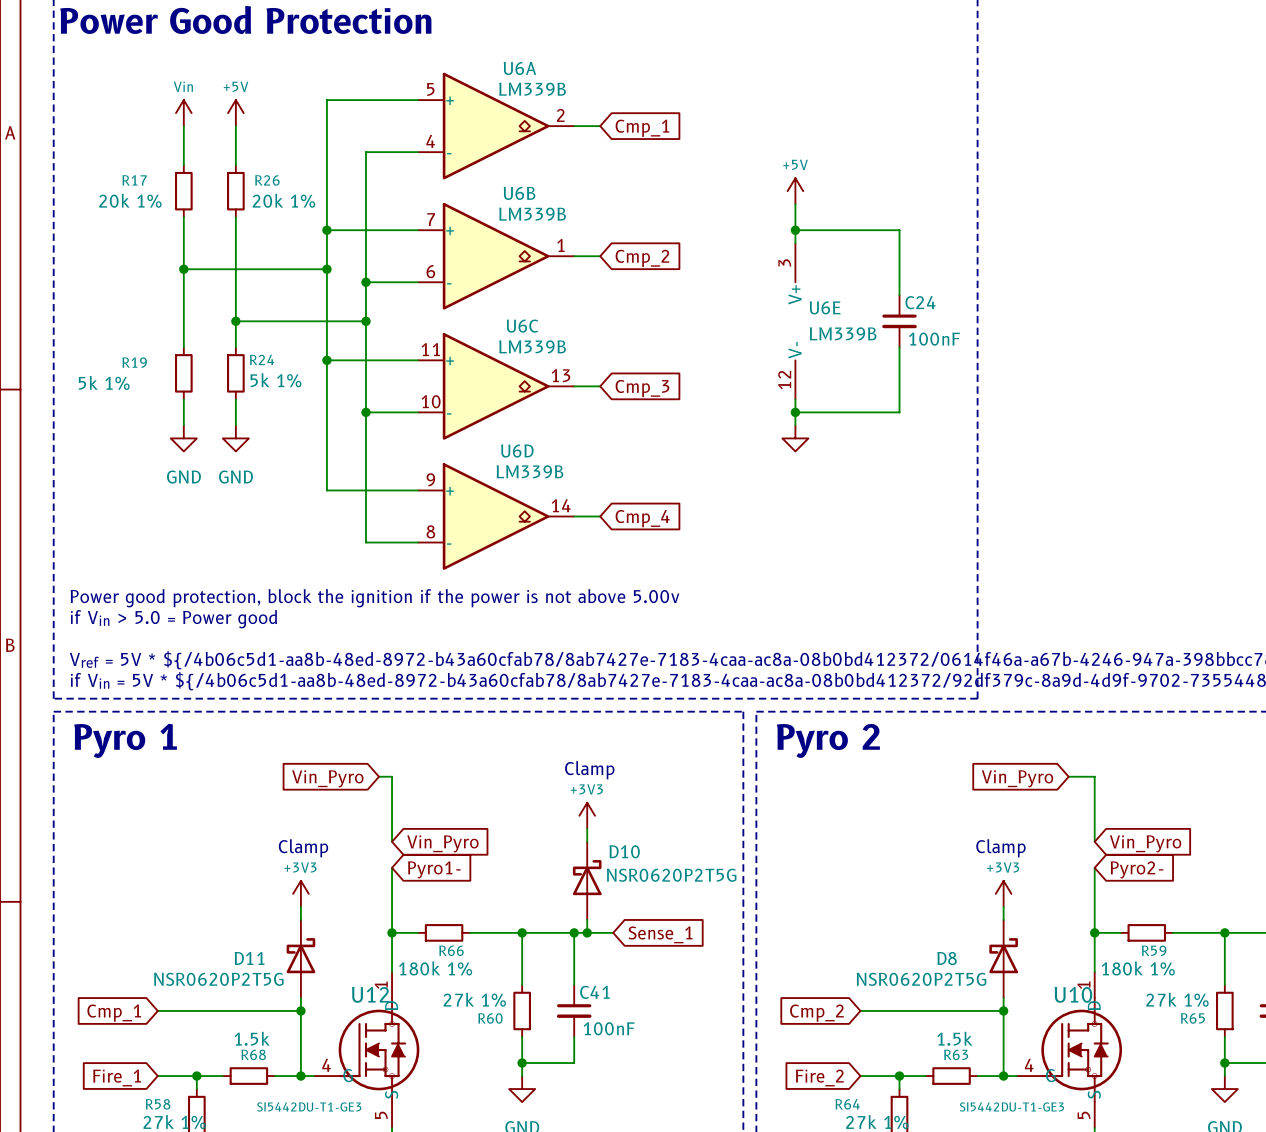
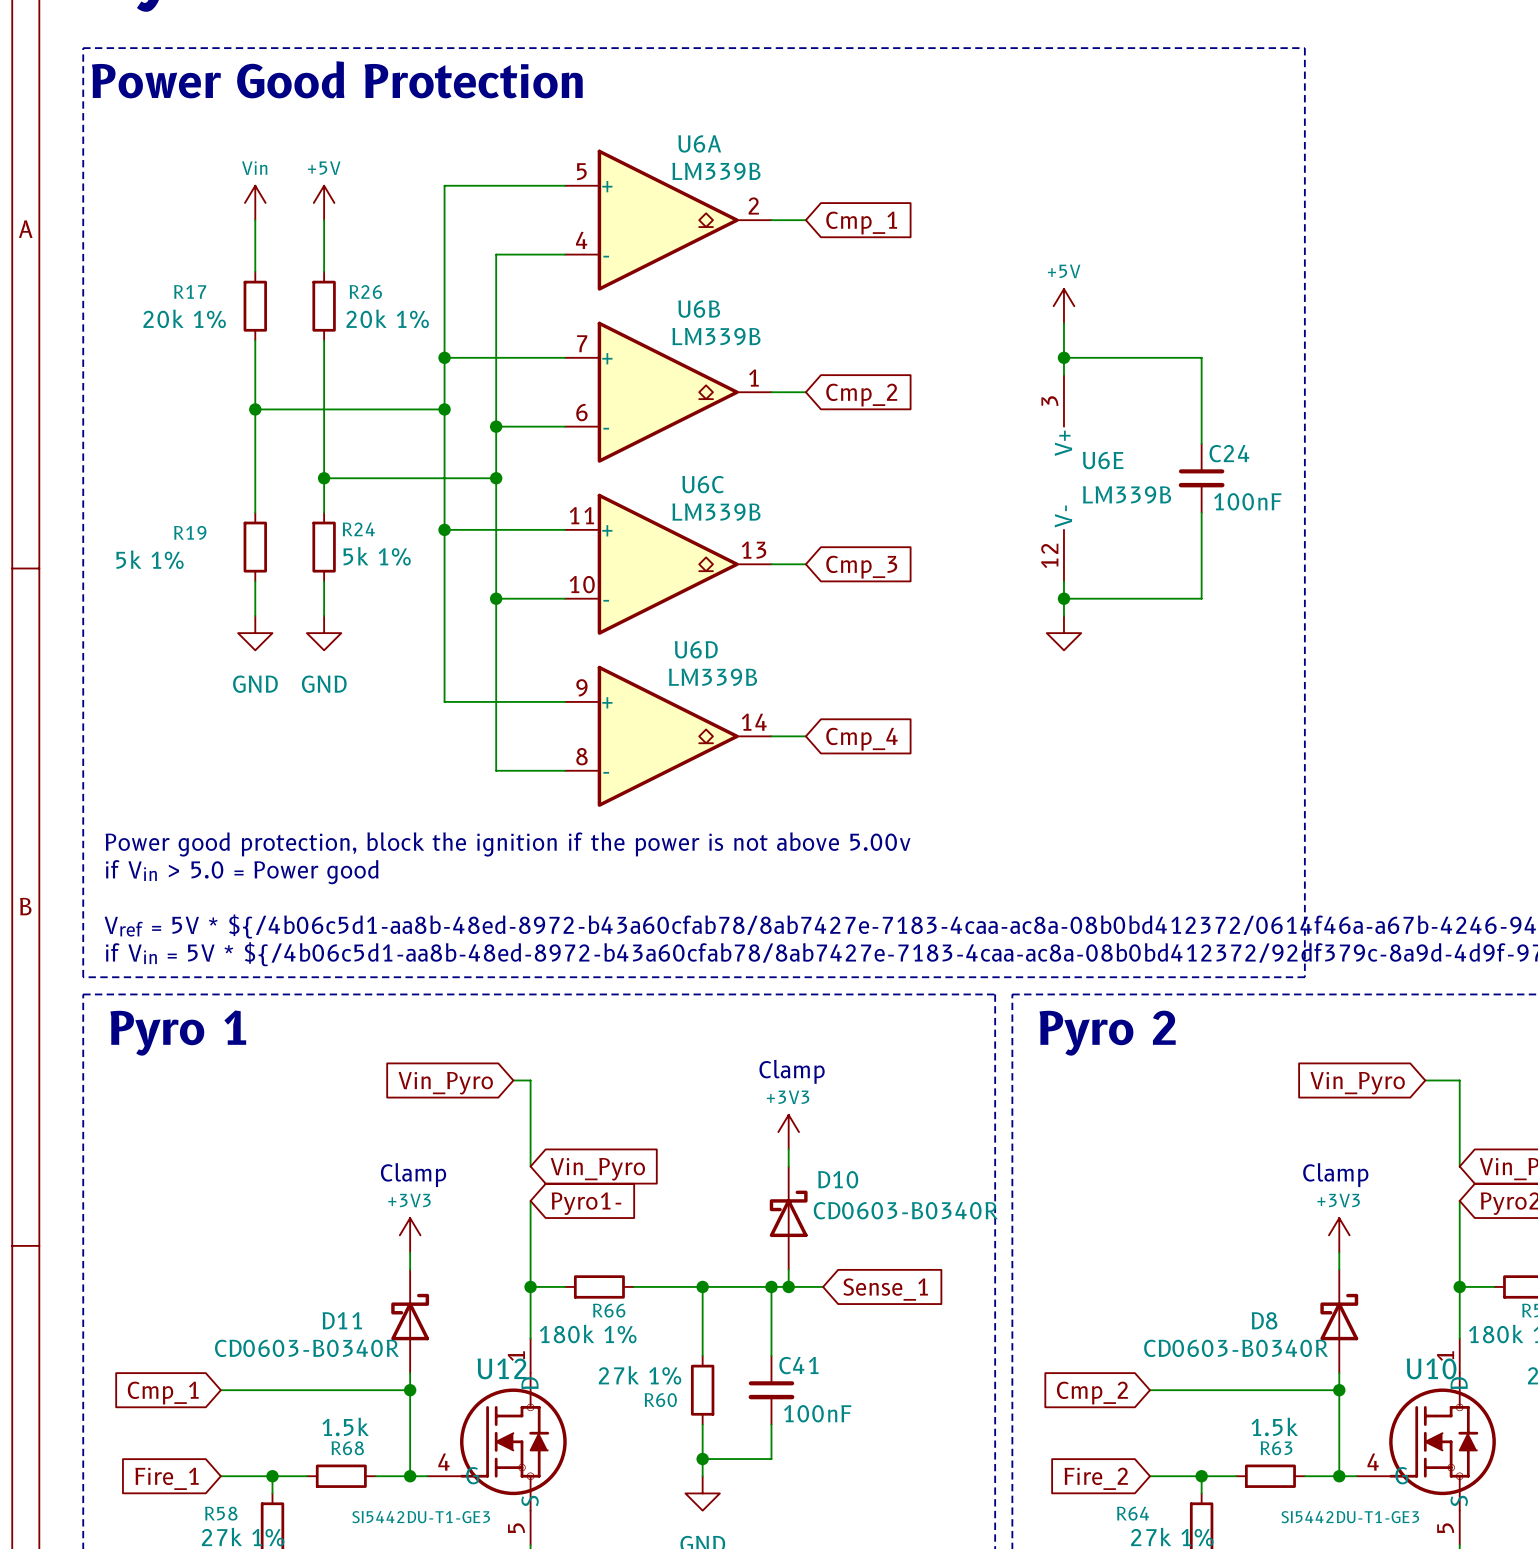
D10 value: NSR0620P2T5G (671, 875) -> CD0603-B0340R (905, 1210)
D11 value: NSR0620P2T5G (218, 979) -> CD0603-B0340R (306, 1348)
D8 value: NSR0620P2T5G (921, 979) -> CD0603-B0340R (1236, 1348)

